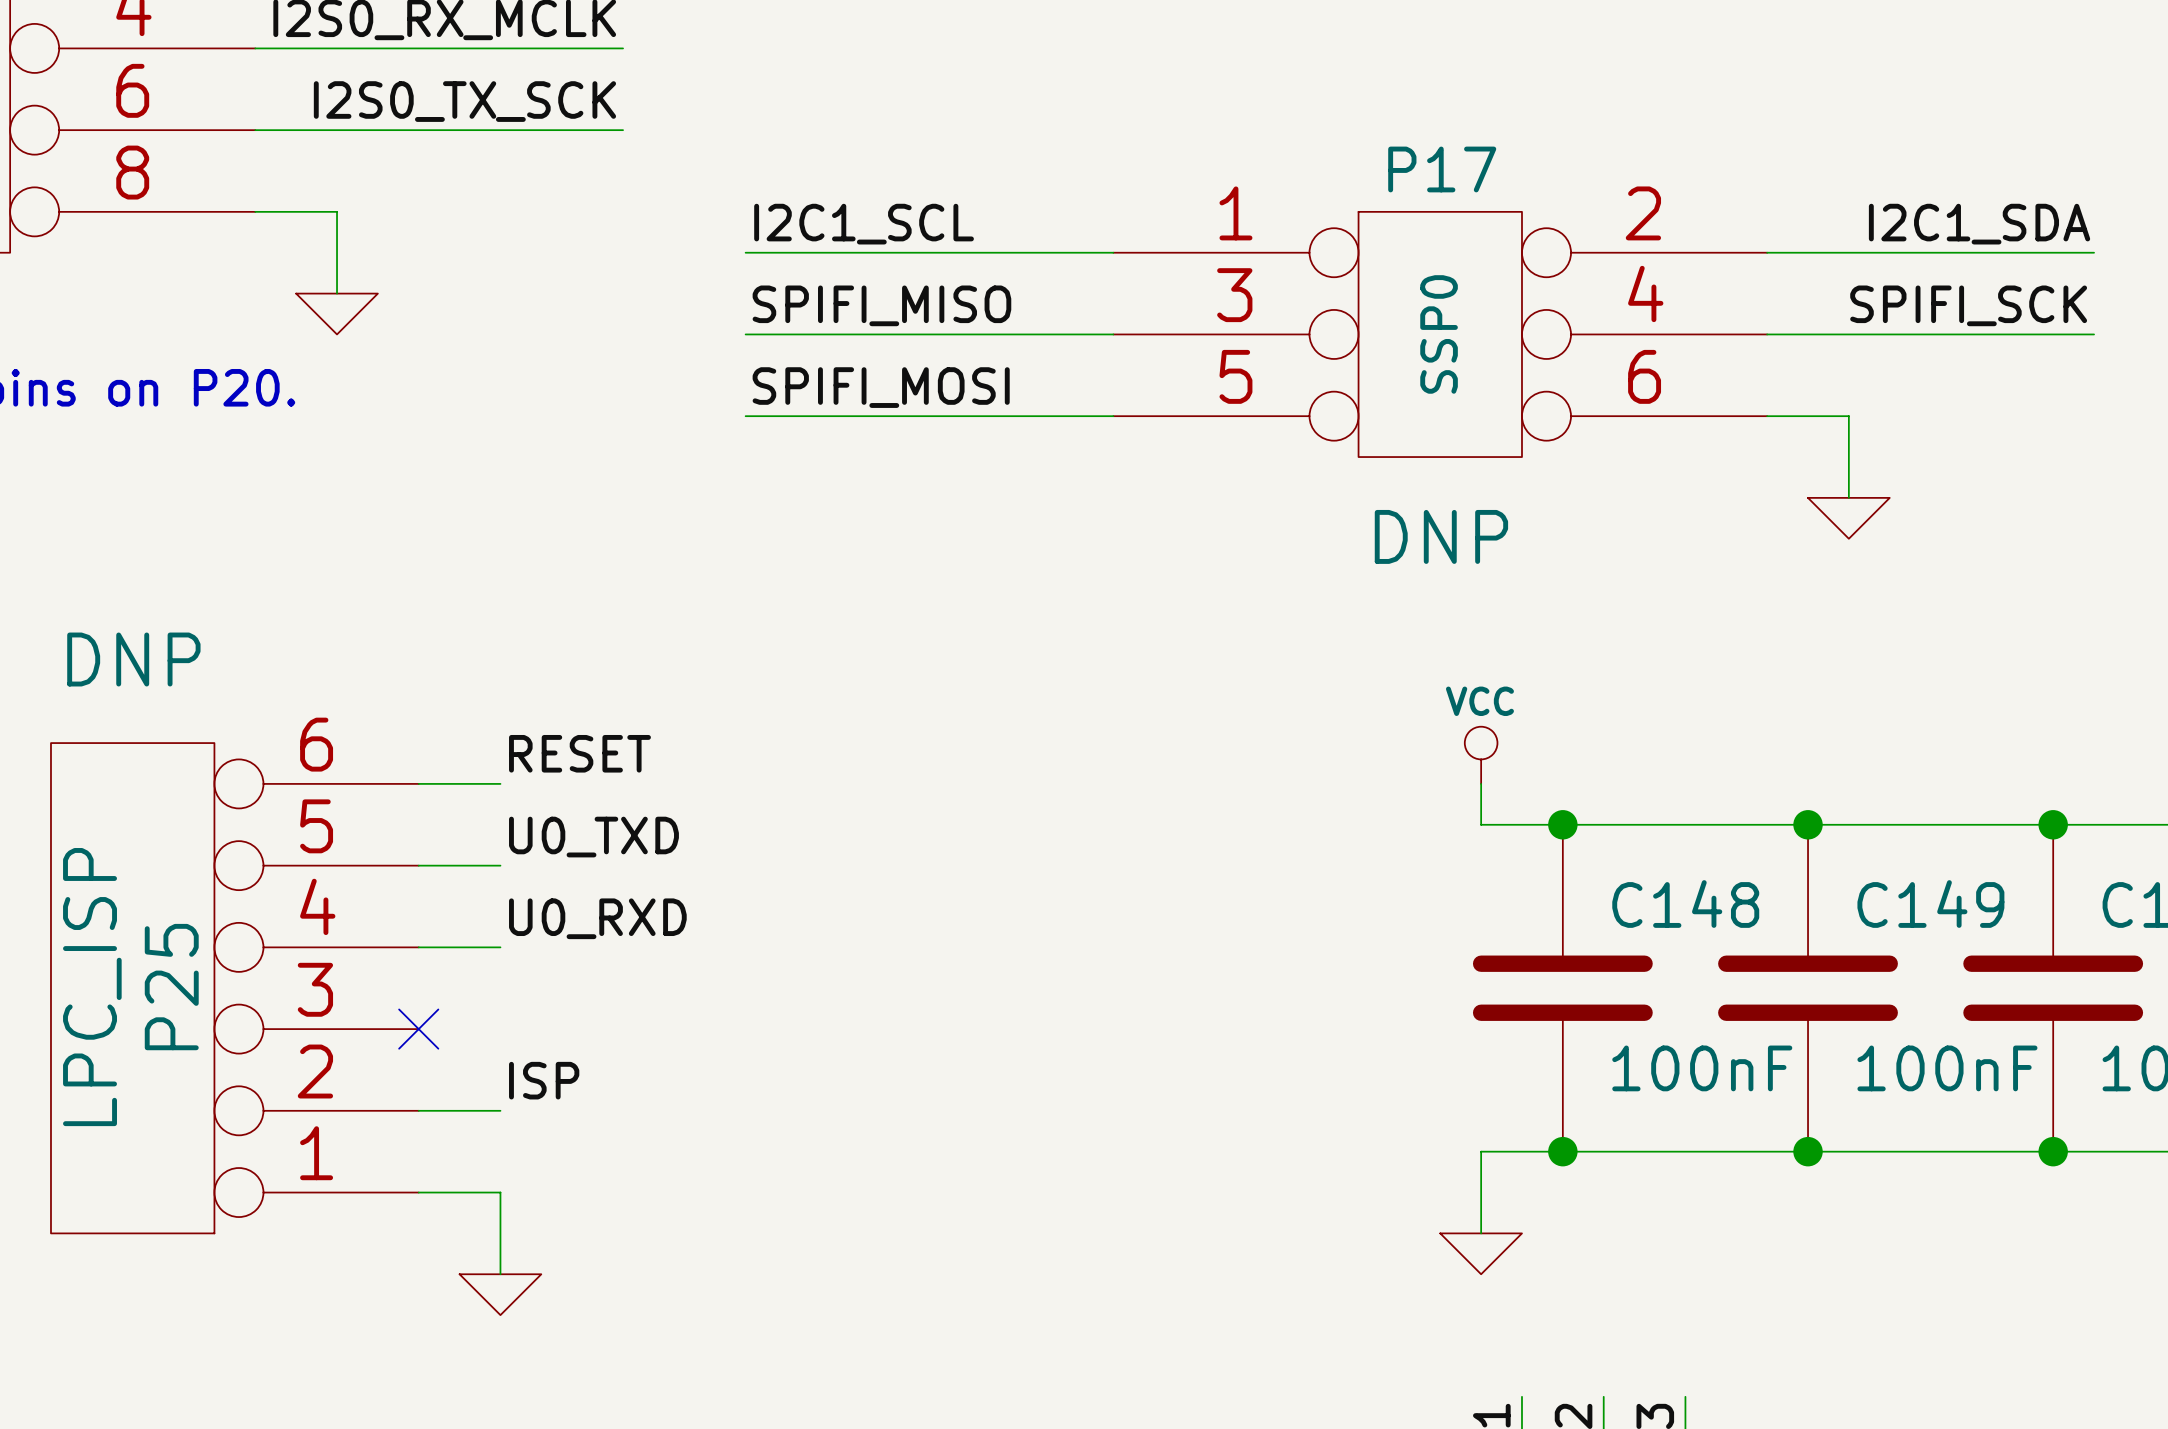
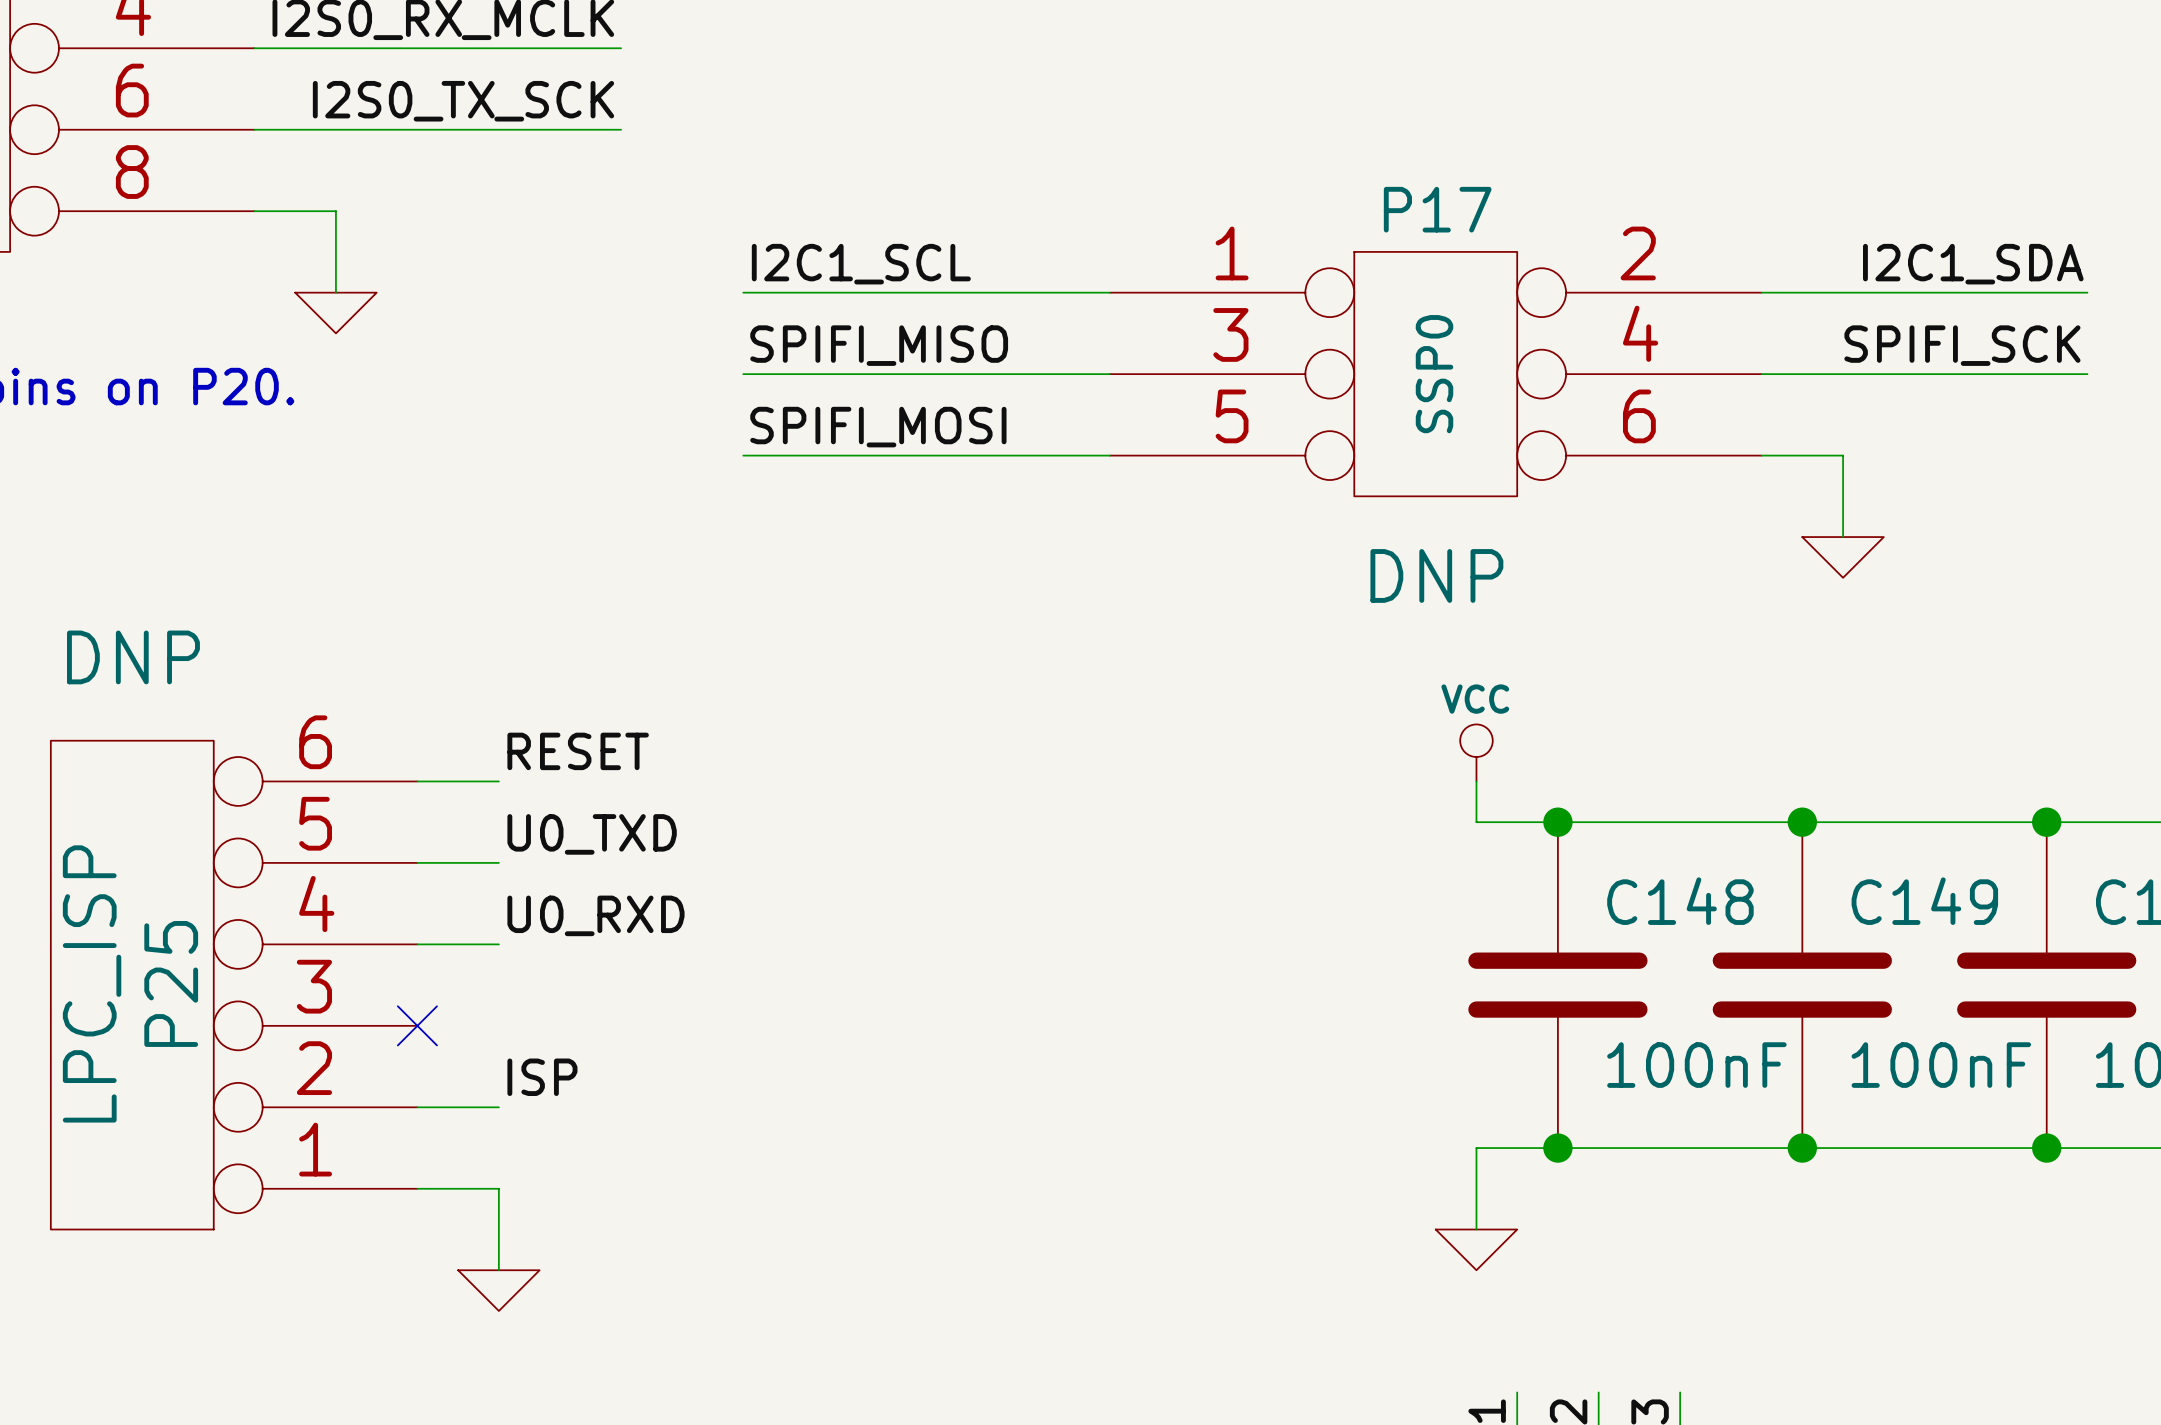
label position: I2C1_SCL (864, 224) -> I2C1_SCL (861, 264)
label position: I2C1_SDA (1979, 224) -> I2C1_SDA (1973, 264)
wire: (745, 252) (1113, 252) -> (743, 292) (1109, 292)
wire: (1767, 252) (2094, 252) -> (1761, 292) (2087, 292)
label position: SPIFI_MISO (881, 305) -> SPIFI_MISO (879, 345)
label position: SPIFI_SCK (1968, 305) -> SPIFI_SCK (1962, 345)
wire: (745, 334) (1113, 334) -> (743, 374) (1109, 374)
P17 position: (1440, 334) -> (1435, 374)
wire: (1767, 334) (2094, 334) -> (1761, 374) (2087, 374)
label position: SPIFI_MOSI (881, 387) -> SPIFI_MOSI (878, 427)
wire: (745, 416) (1113, 416) -> (743, 455) (1109, 455)
wire: (1767, 416) (1848, 416) (1848, 457) -> (1761, 455) (1843, 455)
wire: none -> (1843, 496) (1843, 537)
power symbol position: (1848, 518) -> (1843, 557)

